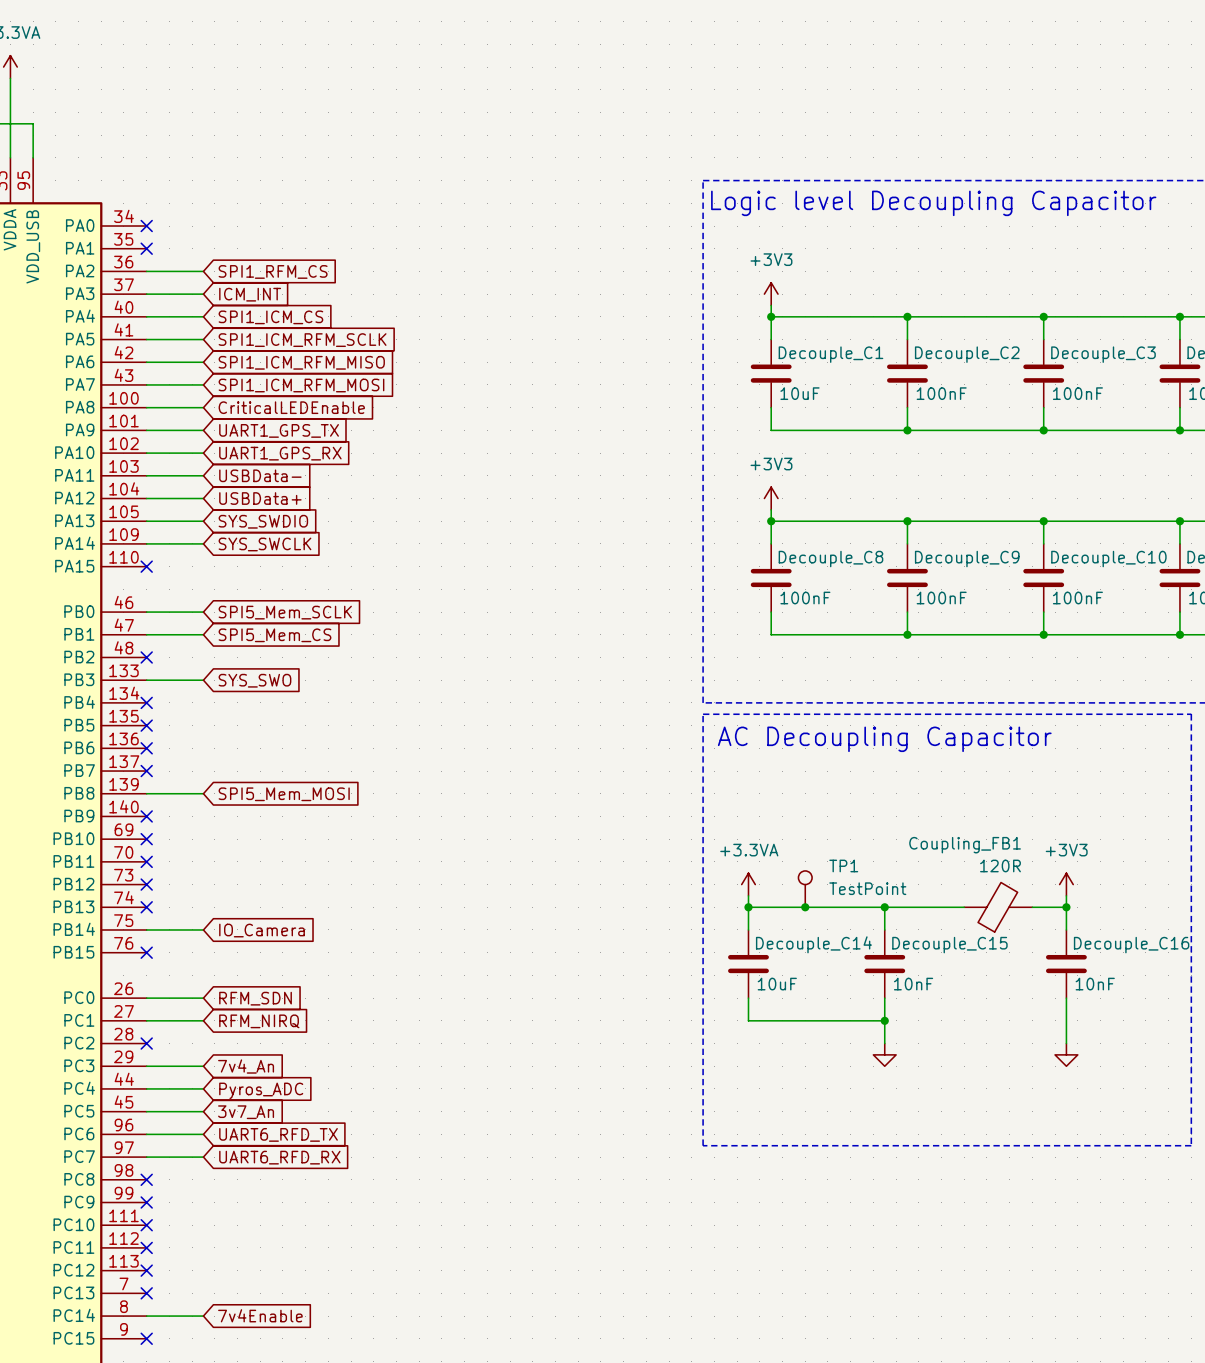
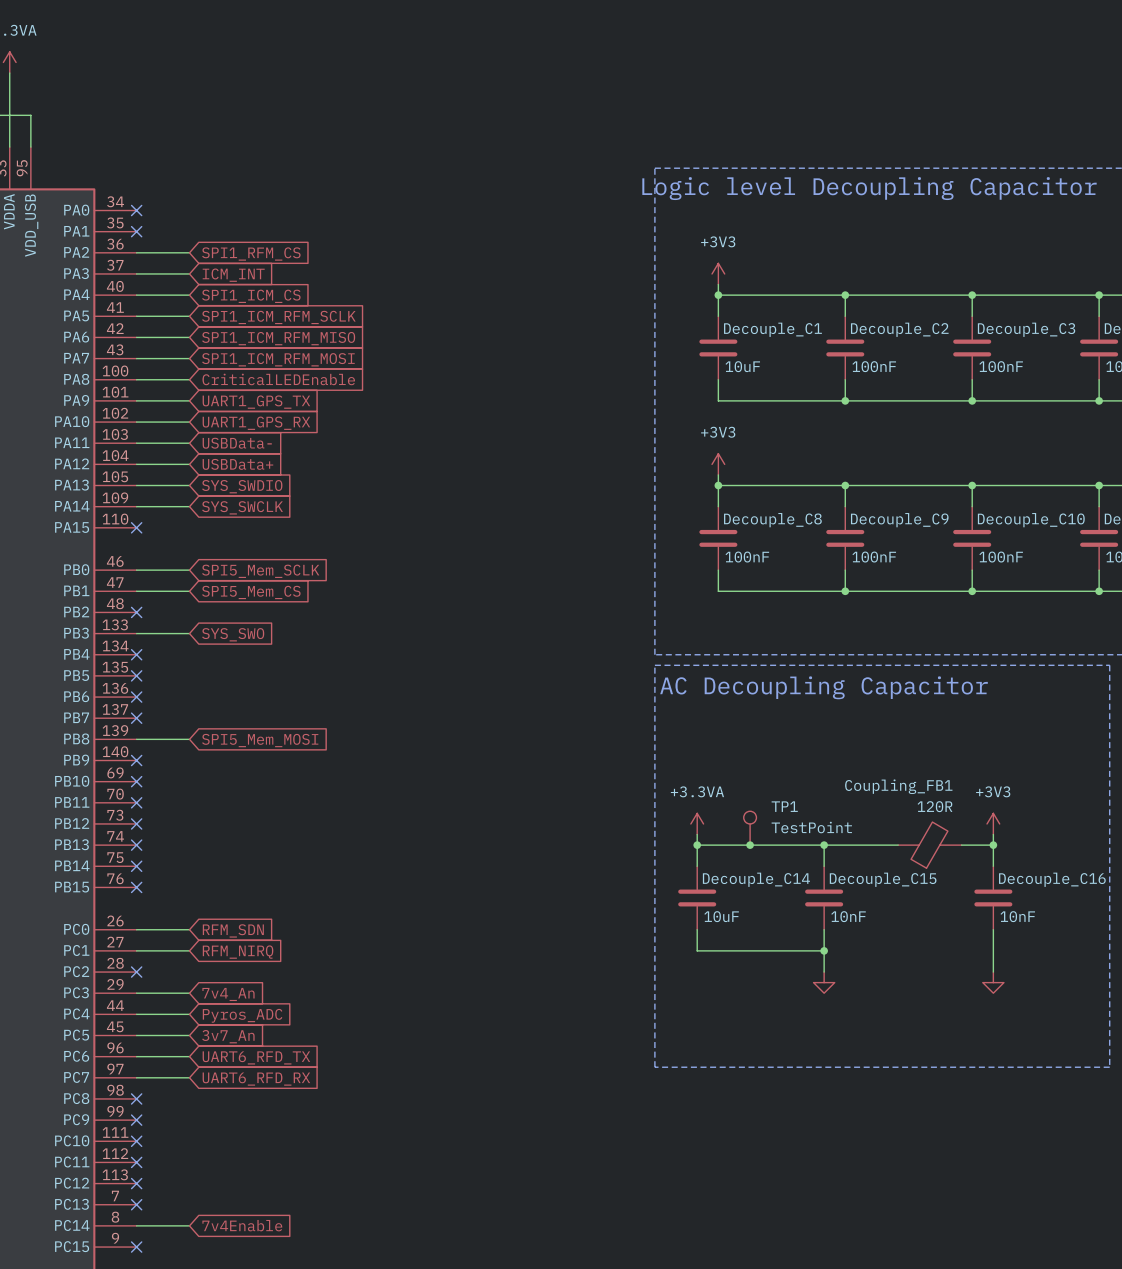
wire: (146, 929) (203, 929) -> none
no-connect mark: none -> (136, 866)
global label: IO_Camera (262, 930) -> none

